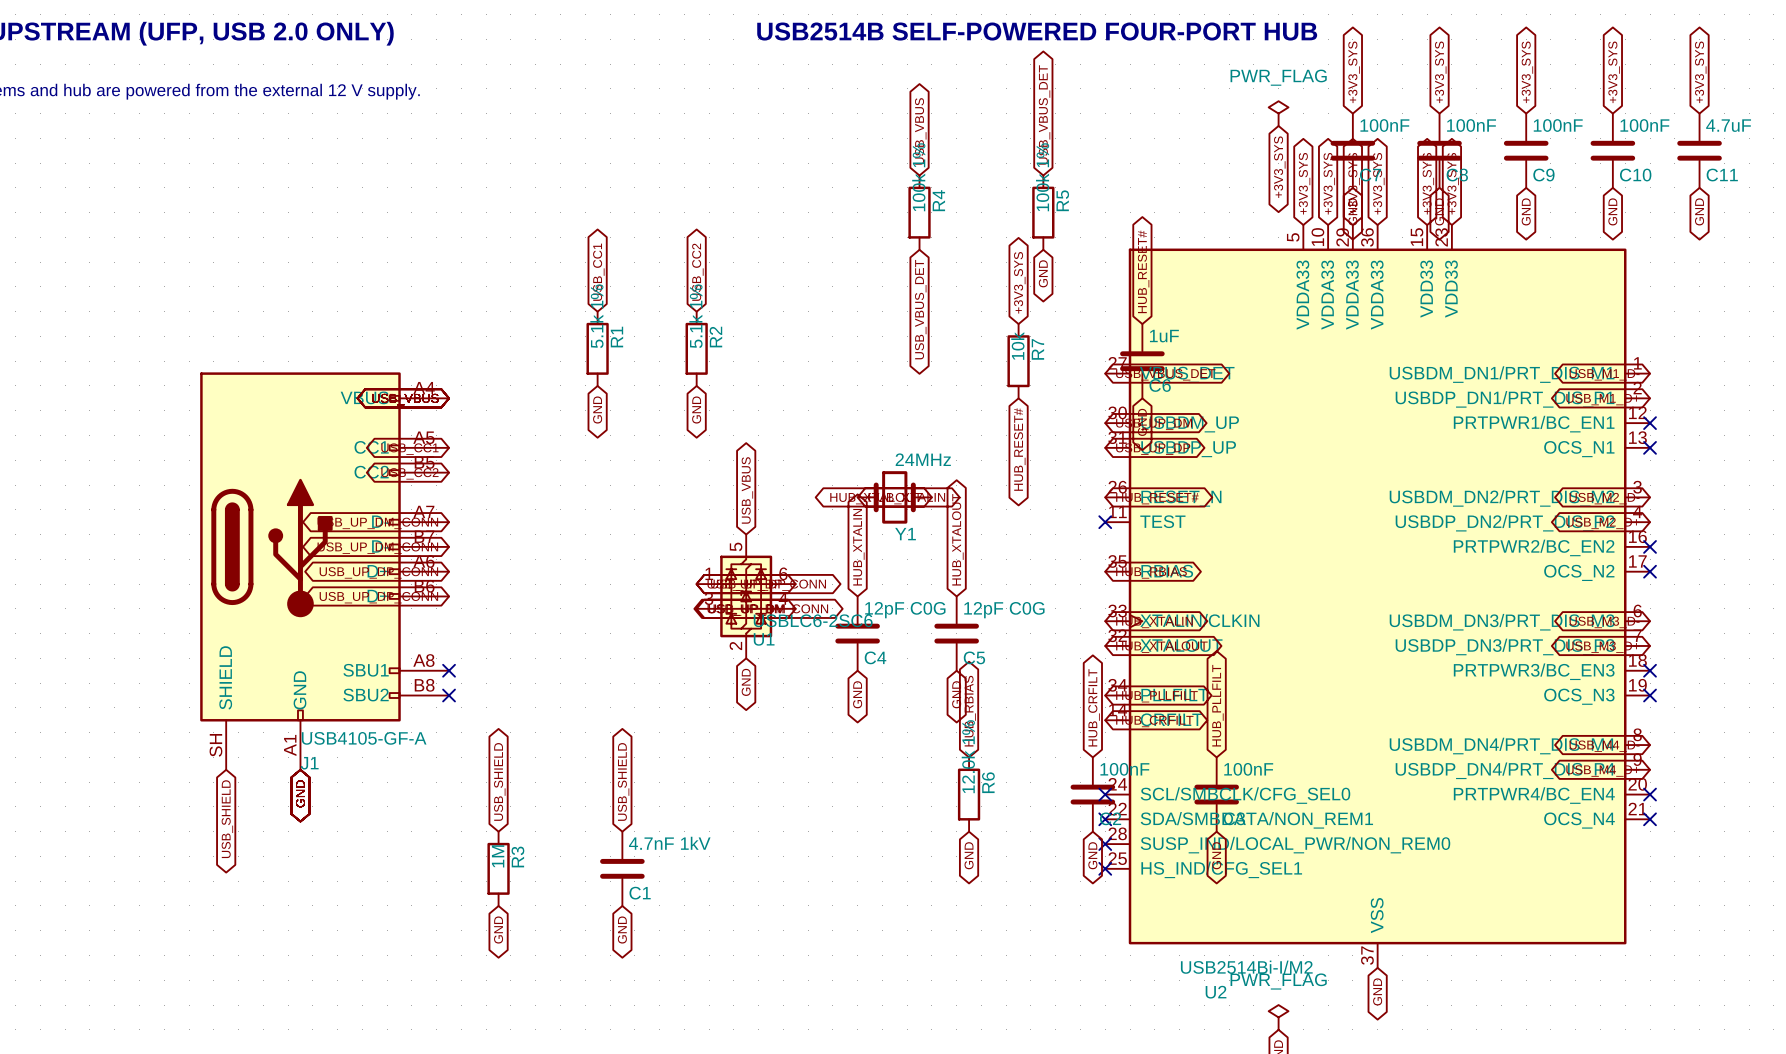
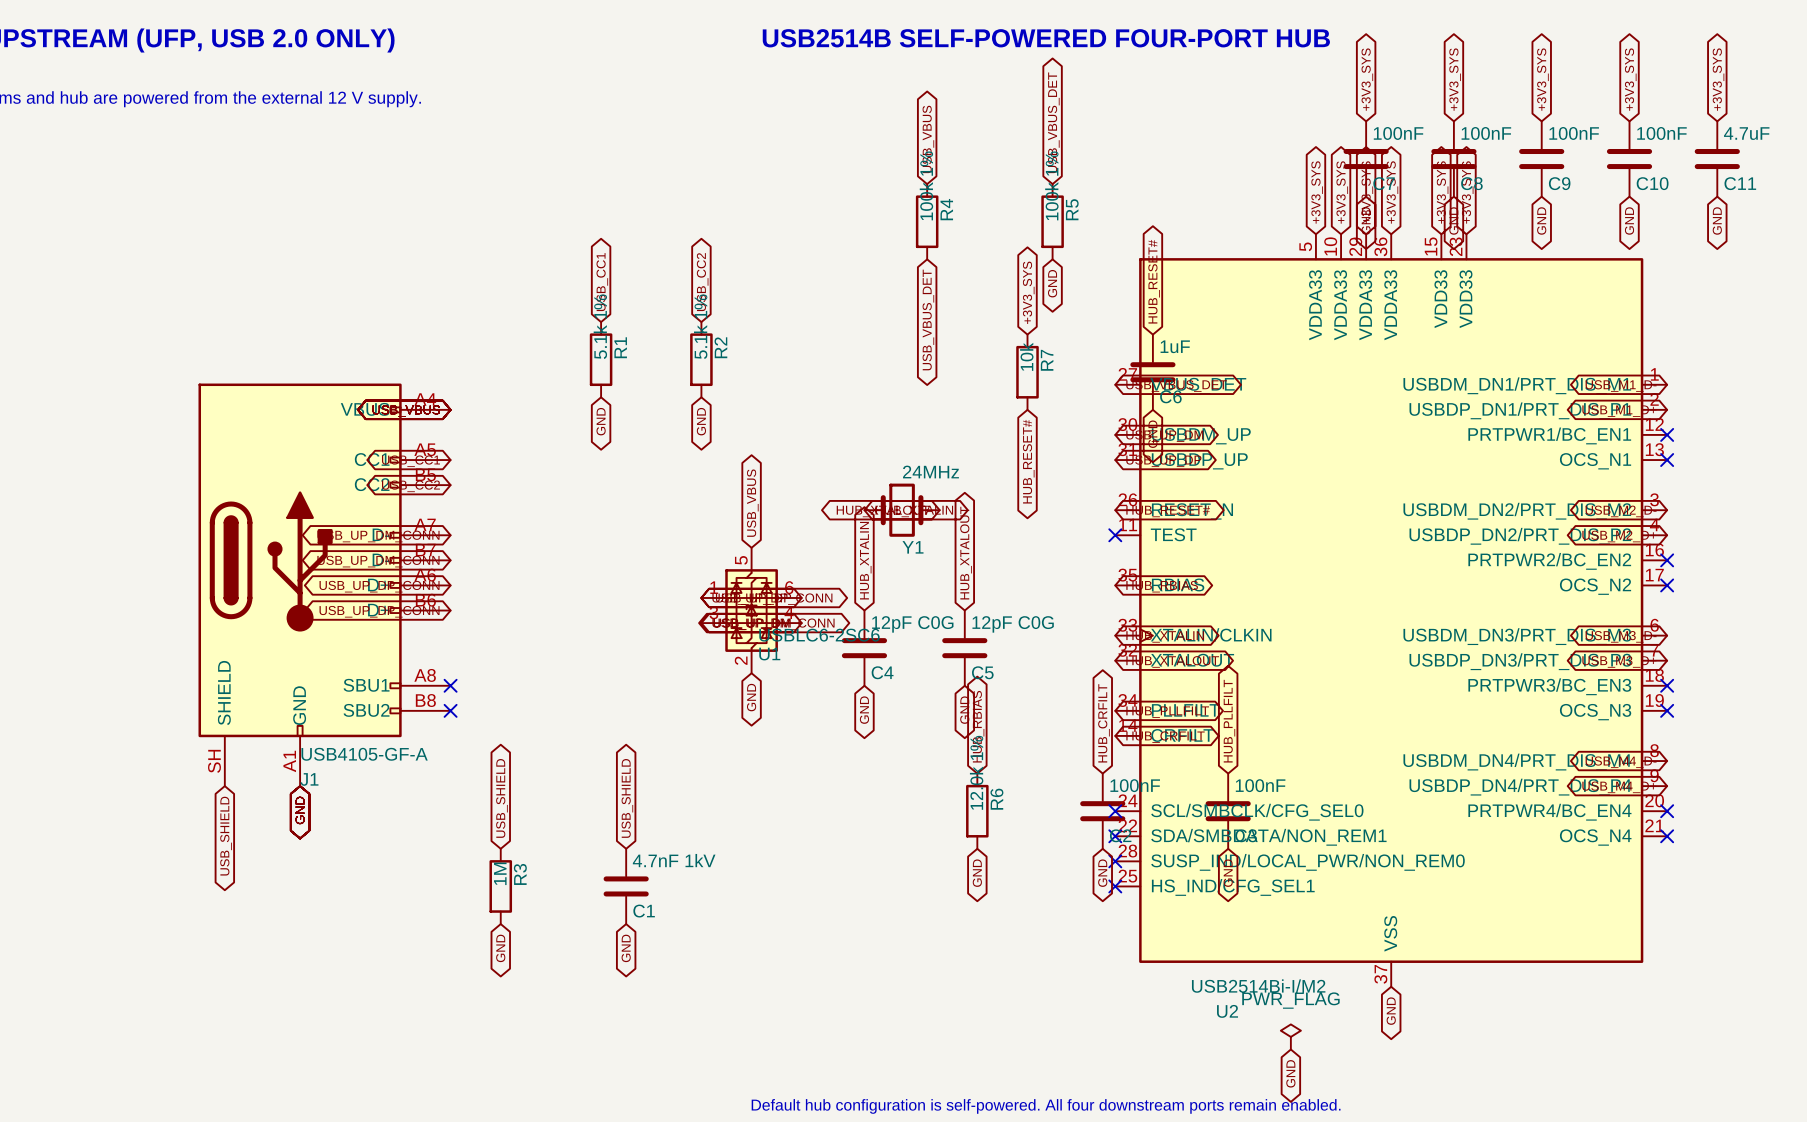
power symbol: PWR_FLAG (1278, 113) -> none
global label: +3V3_SYS (1279, 167) -> none

